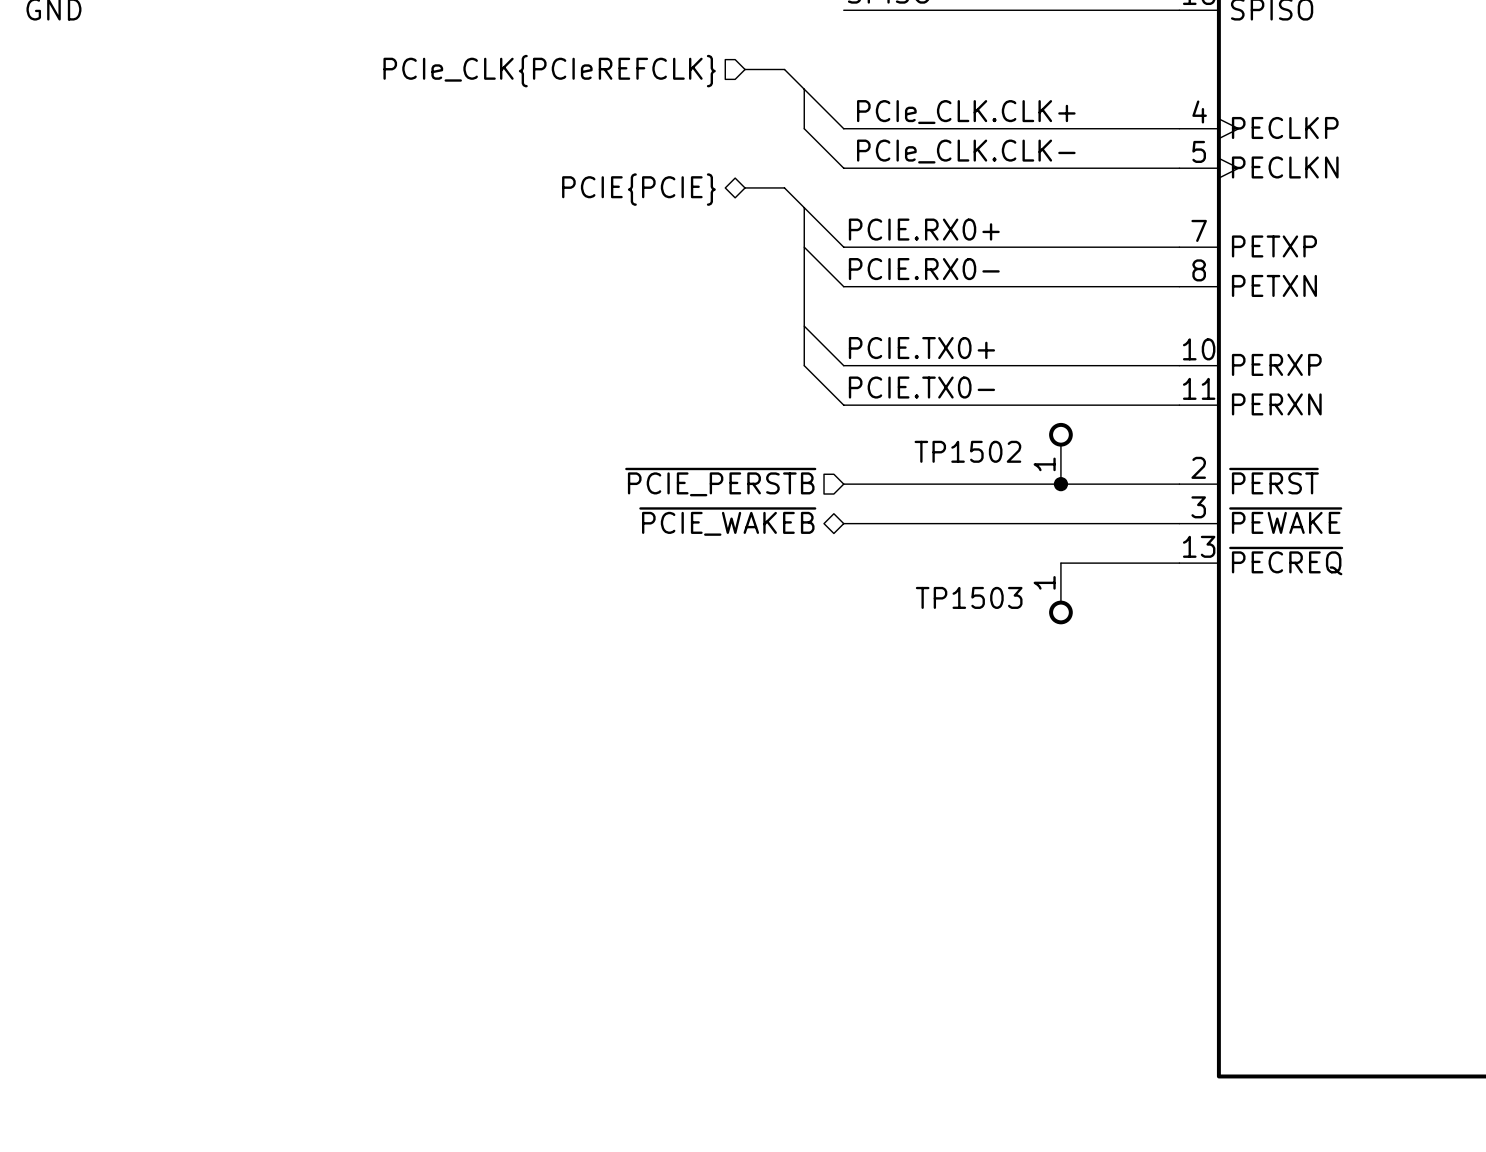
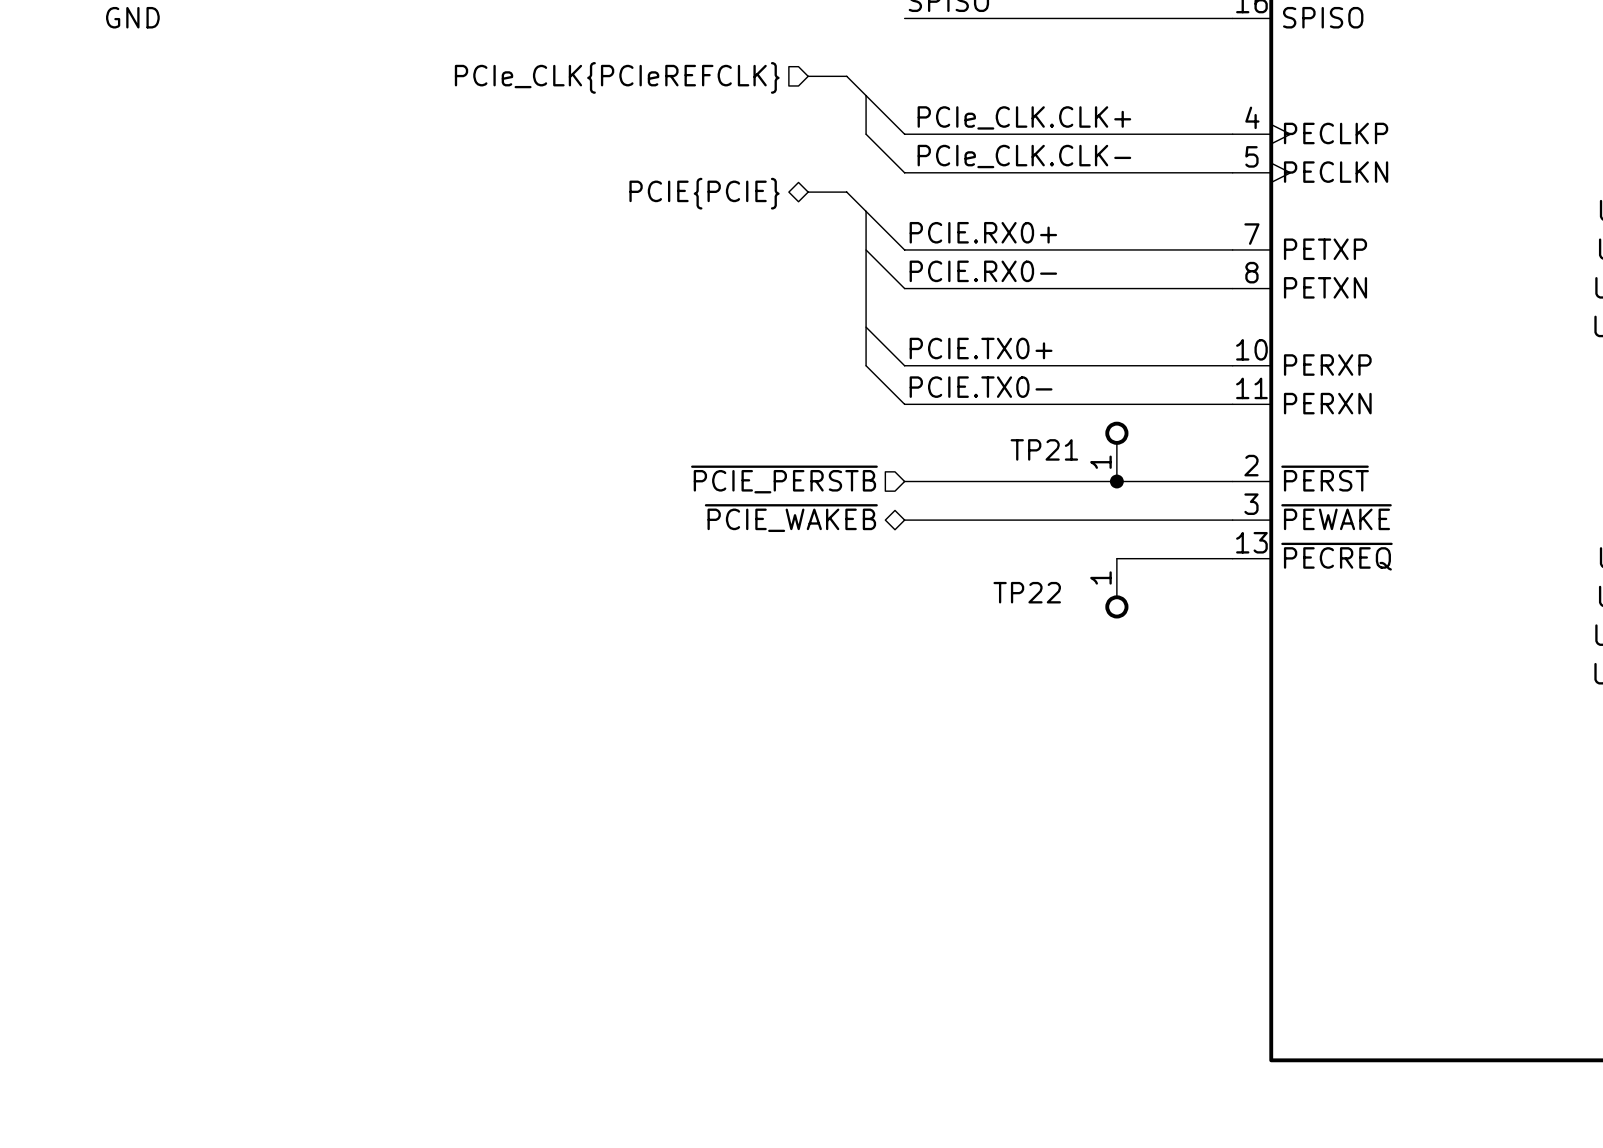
TP1502 name: TP1502 (967, 451) -> TP21 (1044, 449)
TP1503 name: TP1503 (969, 597) -> TP22 (1027, 592)

